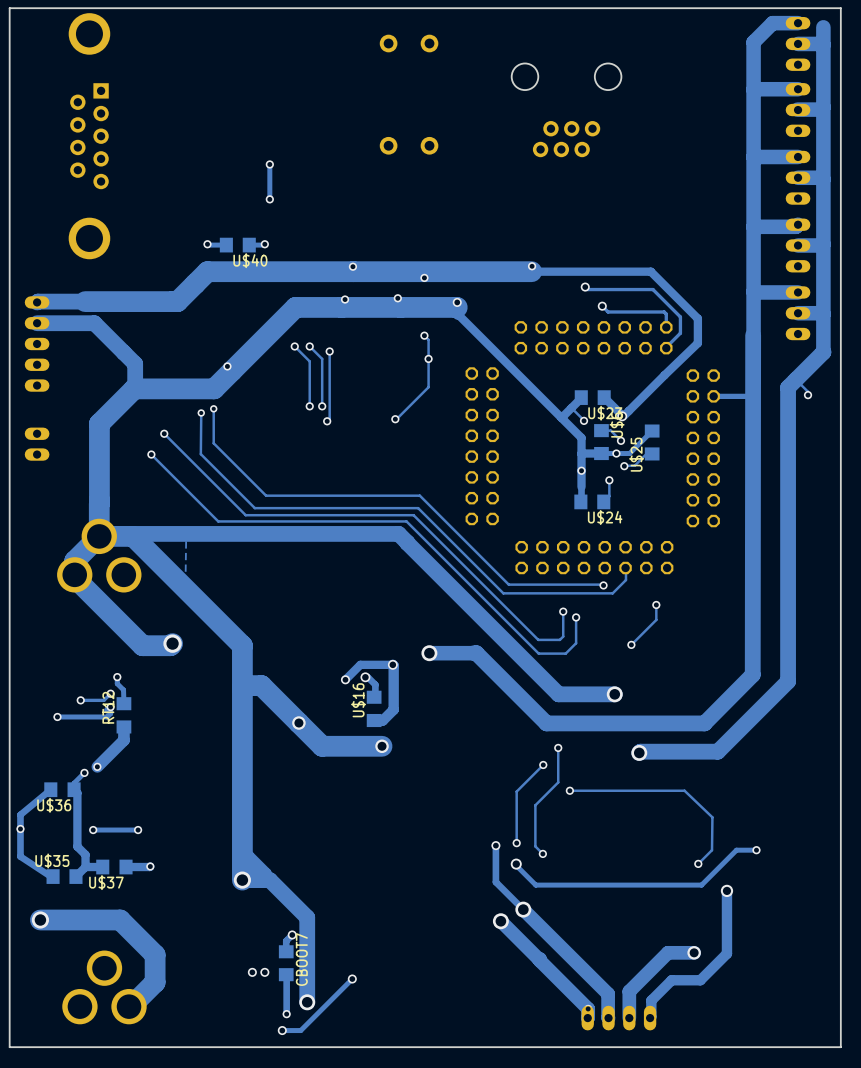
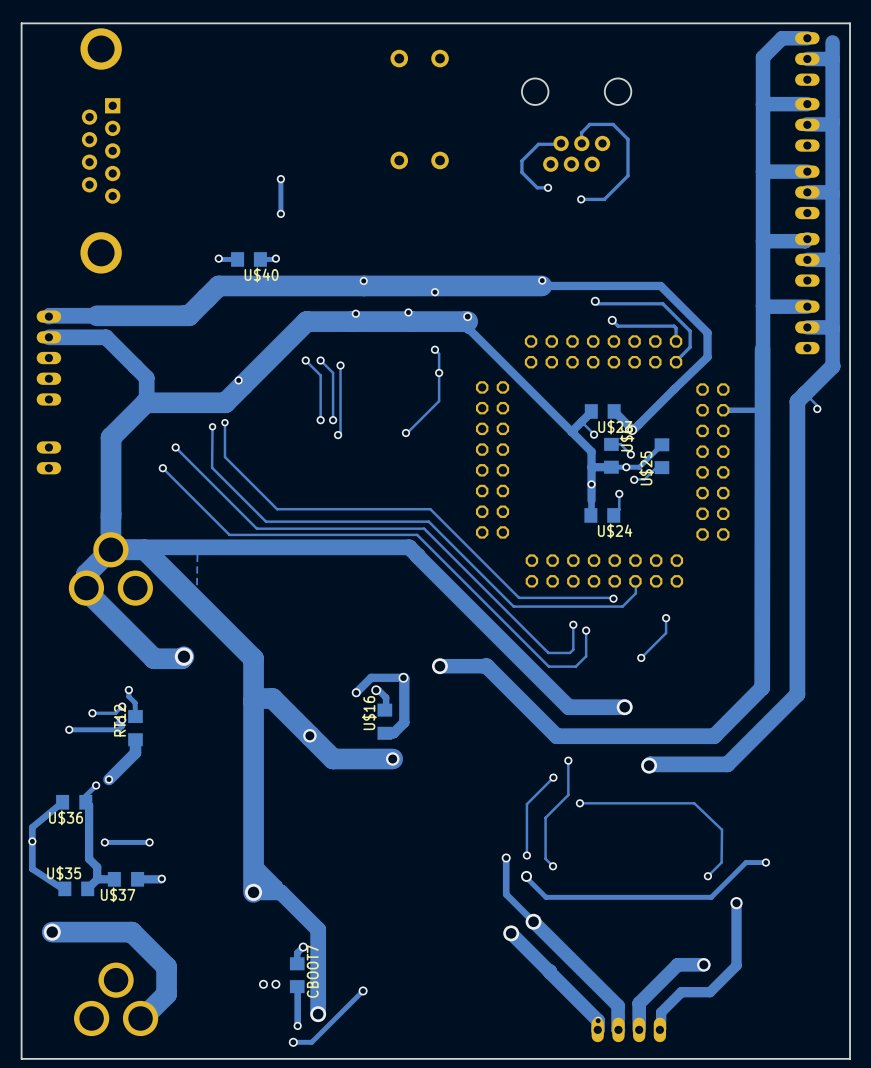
track: none -> (561, 143) (538, 144) (521, 160) (521, 172) (537, 187) (548, 187)
track: none -> (581, 143) (581, 132) (589, 124) (613, 124) (627, 139) (627, 175) (604, 199) (581, 199)
via: none -> (548, 187)
via: none -> (581, 199)

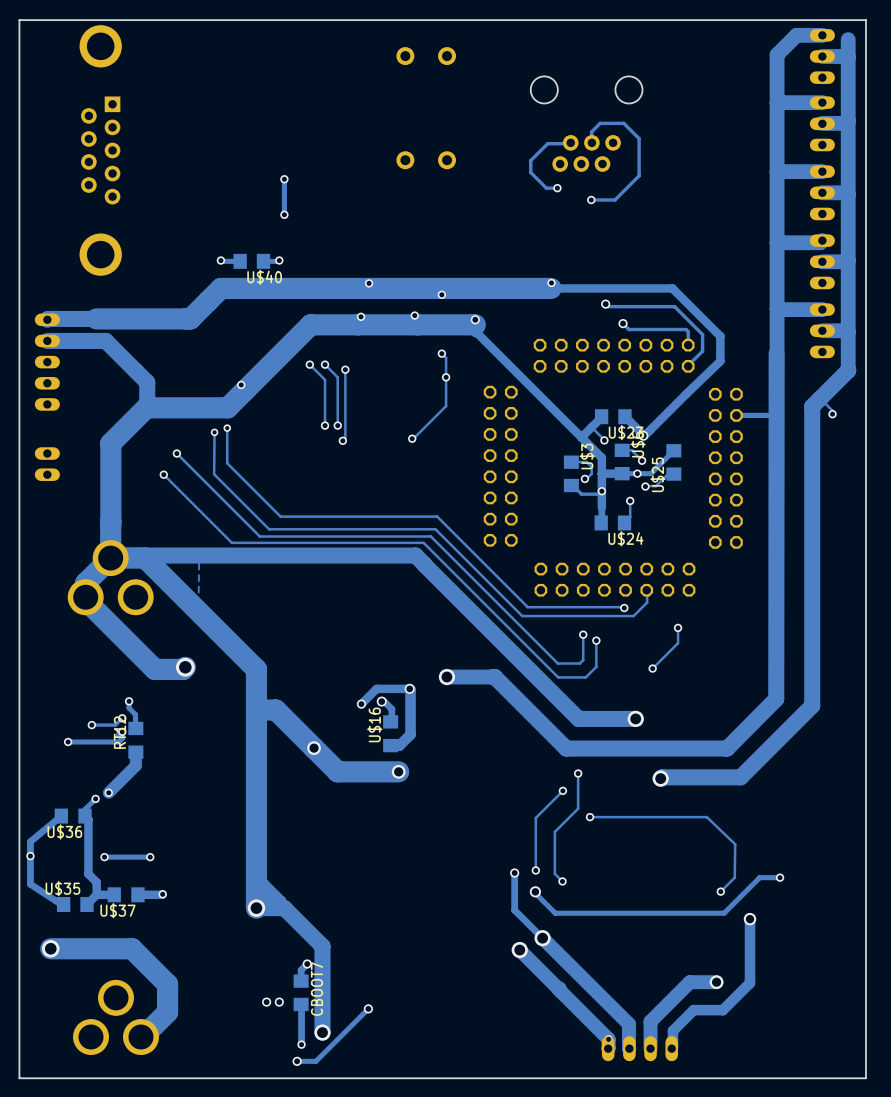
track: none -> (571, 462) (586, 462) (591, 467) (591, 473) (584, 478)
U$3: none -> (571, 473)
via: none -> (584, 478)
track: none -> (571, 485) (581, 494) (598, 494) (601, 490)

